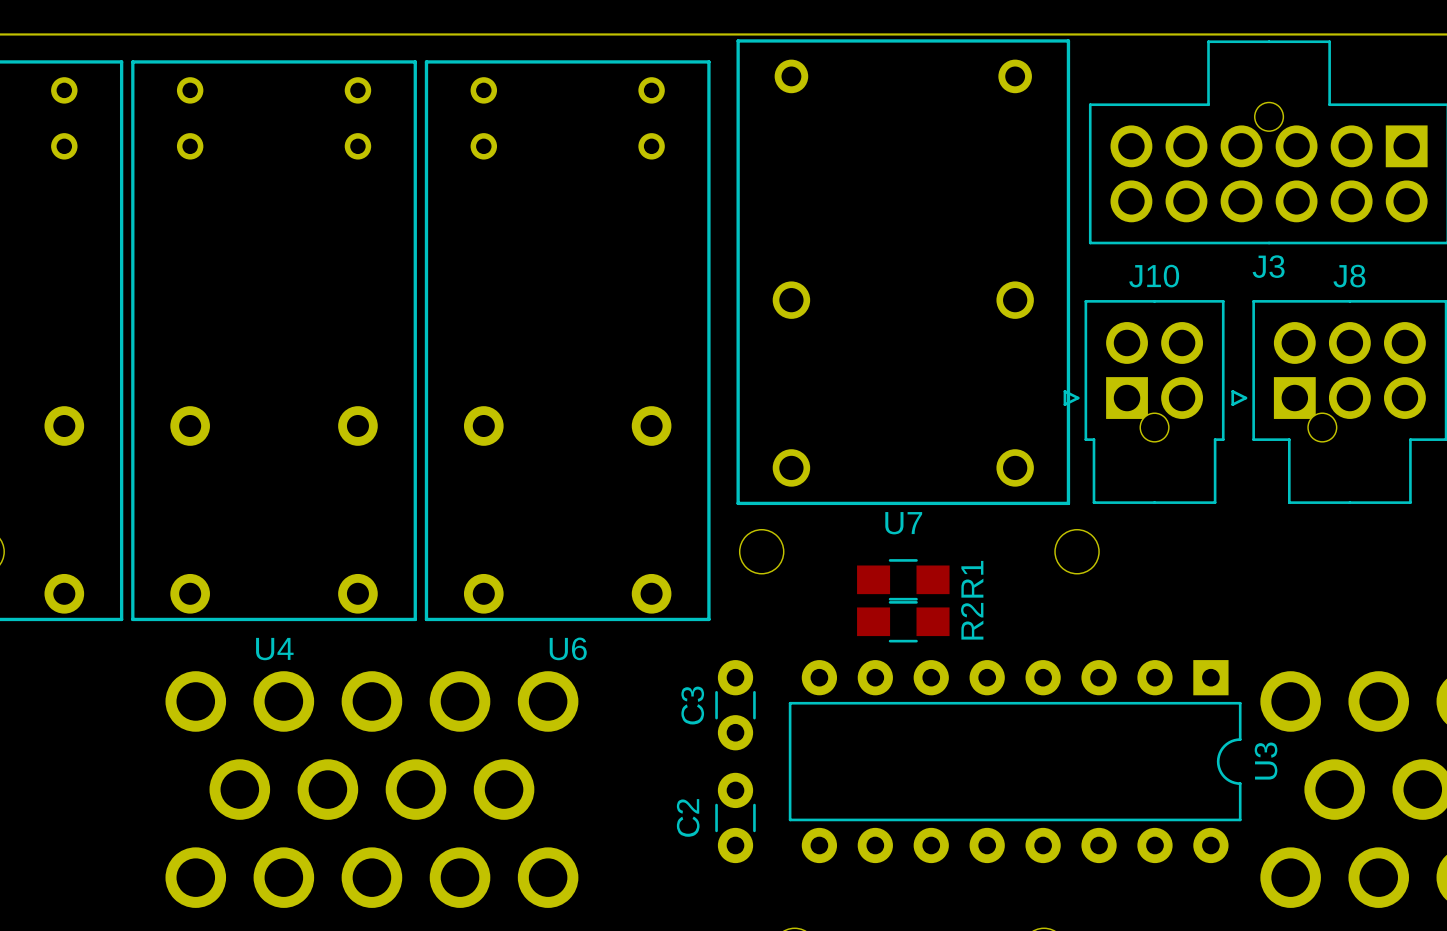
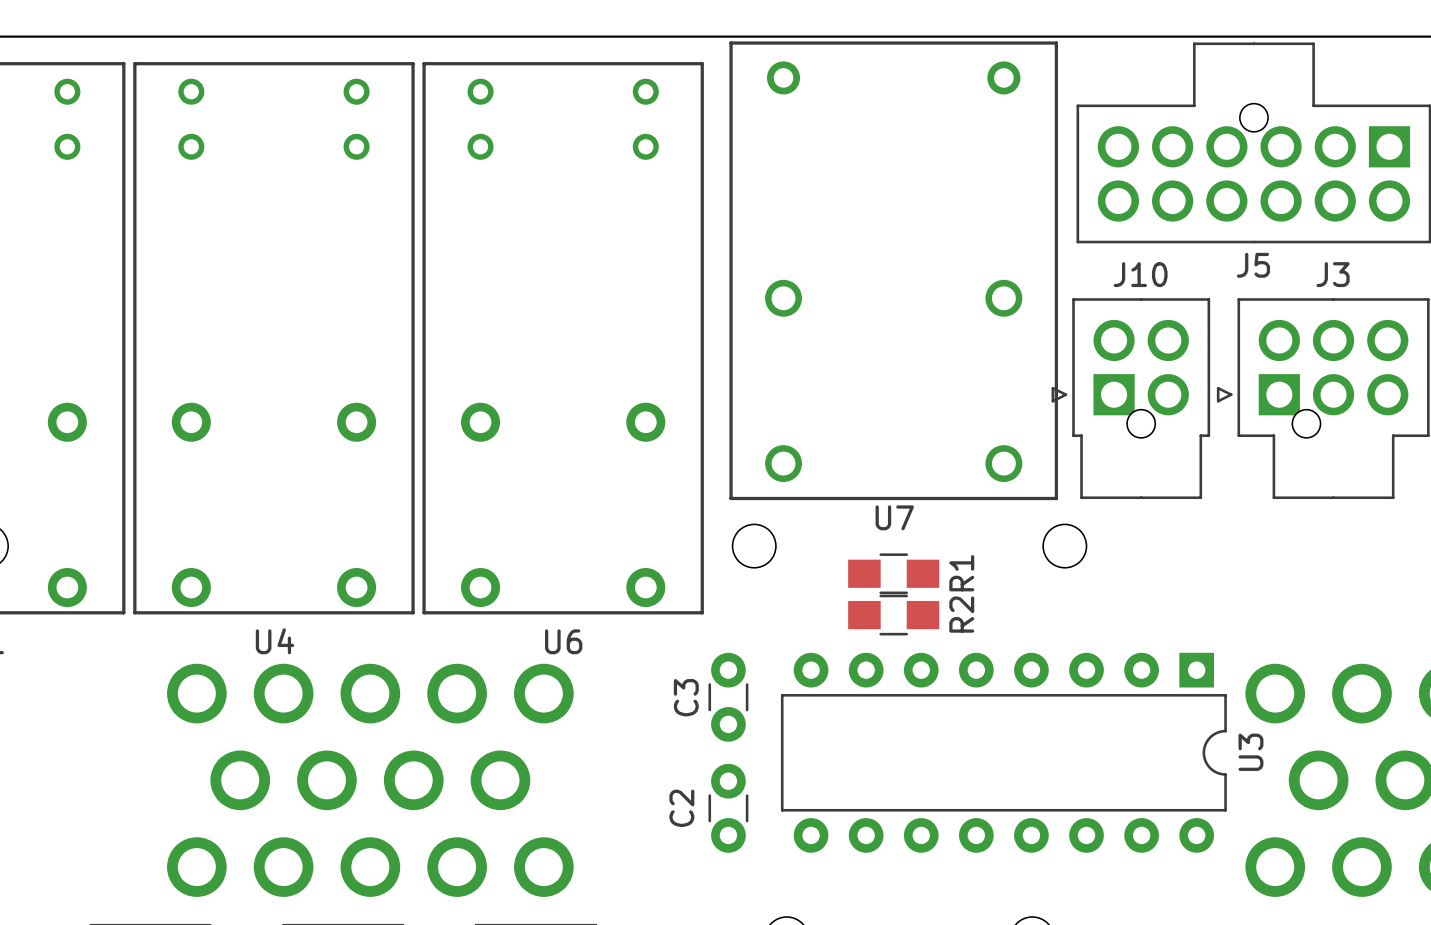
J3 name: J3 (1268, 266) -> J5 (1253, 265)
J8 name: J8 (1349, 276) -> J3 (1333, 274)

